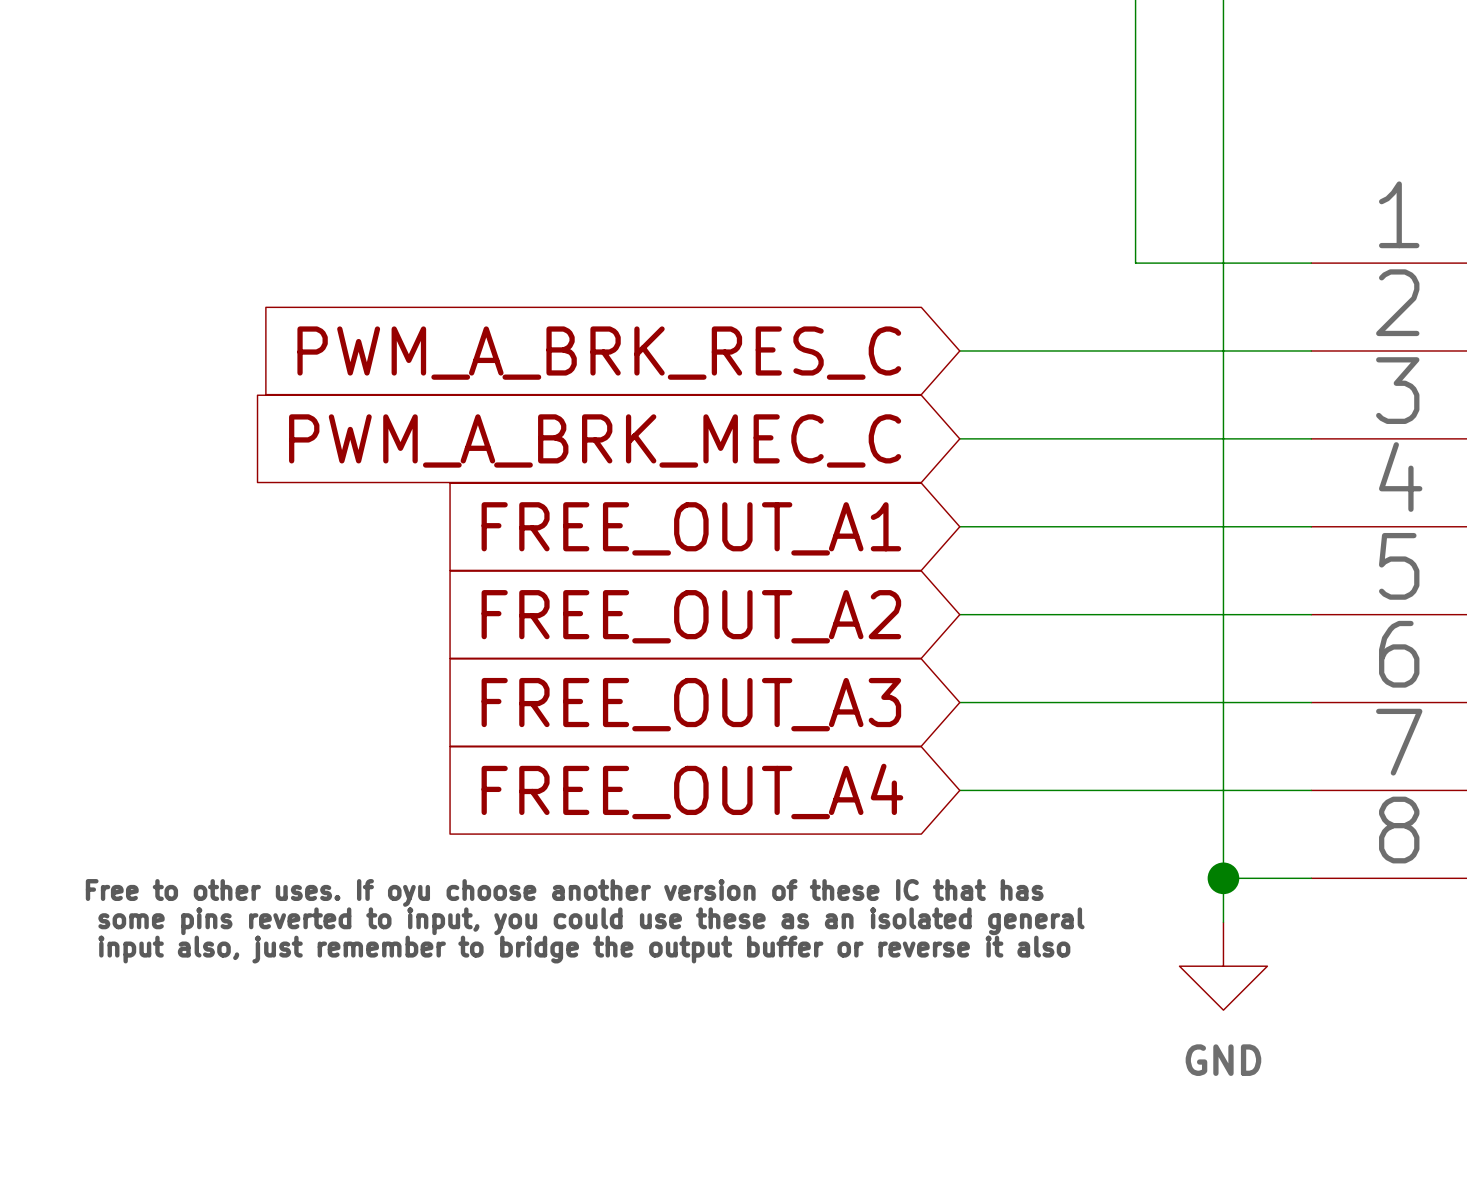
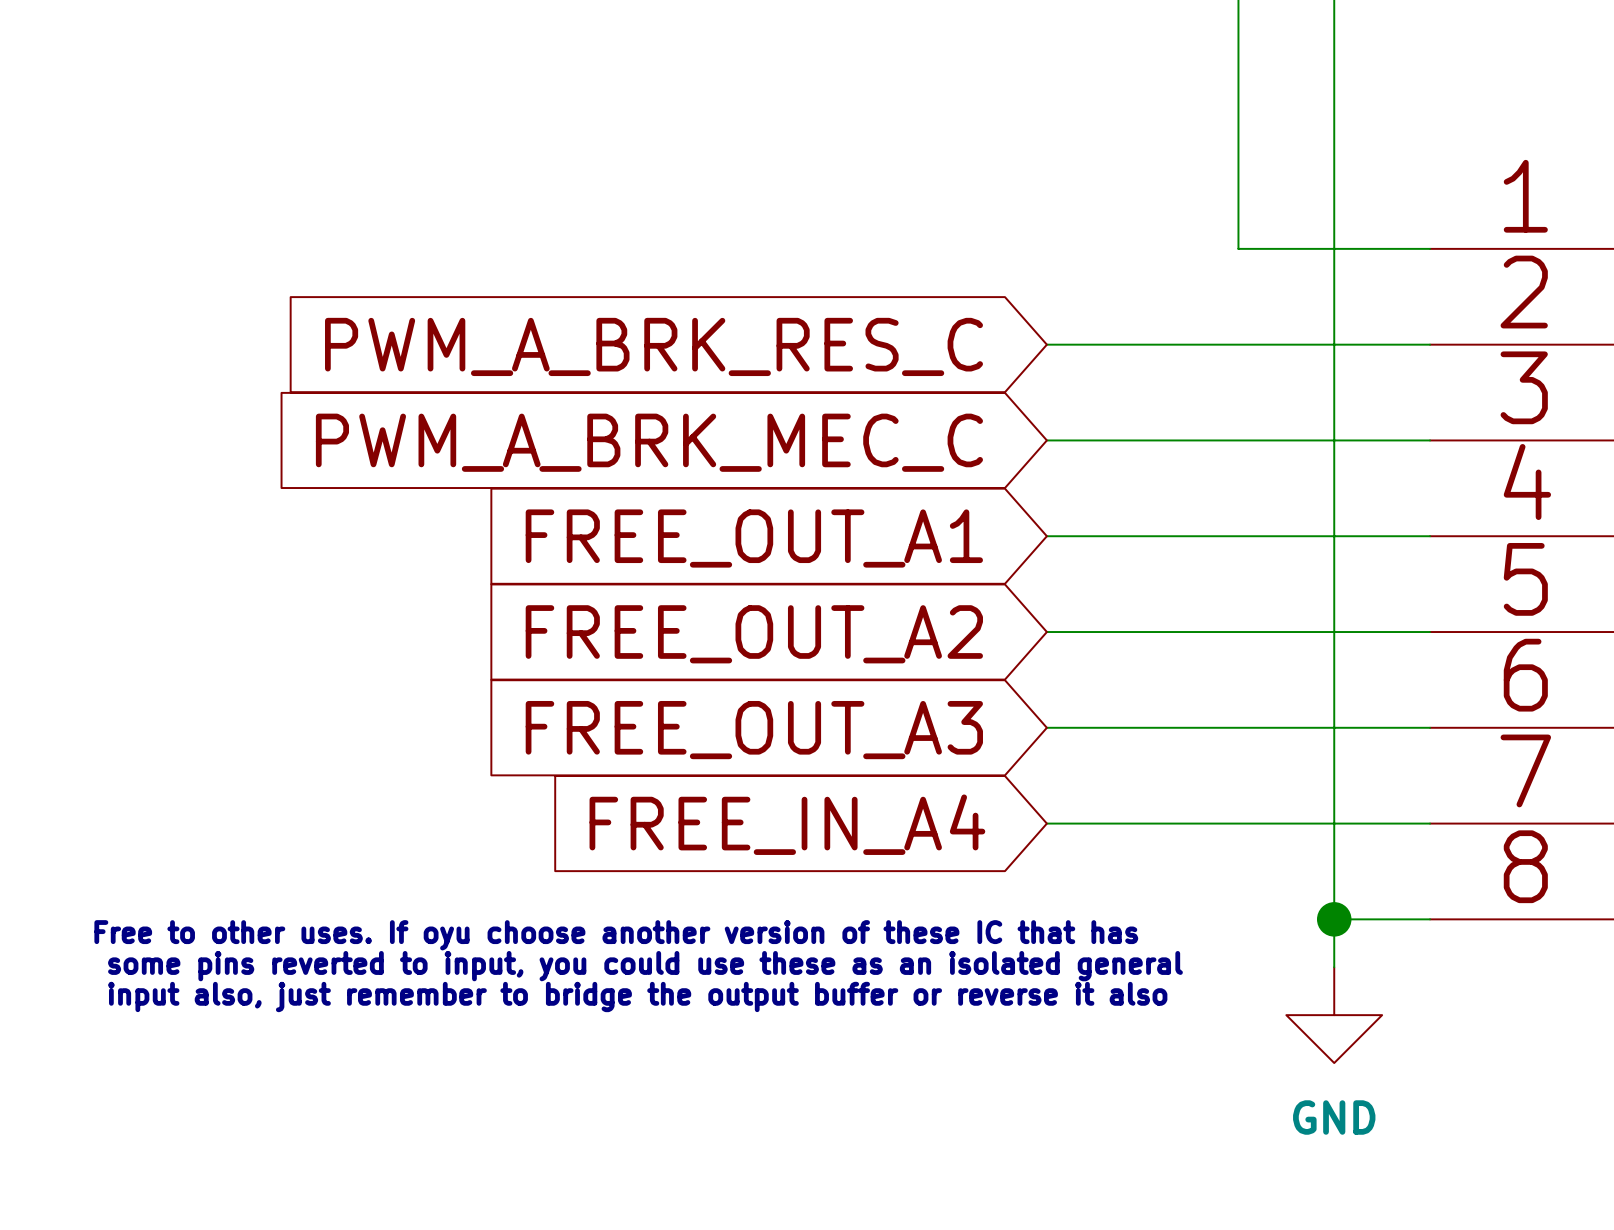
global label: FREE_OUT_A4 (692, 791) -> FREE_IN_A4 (787, 824)

